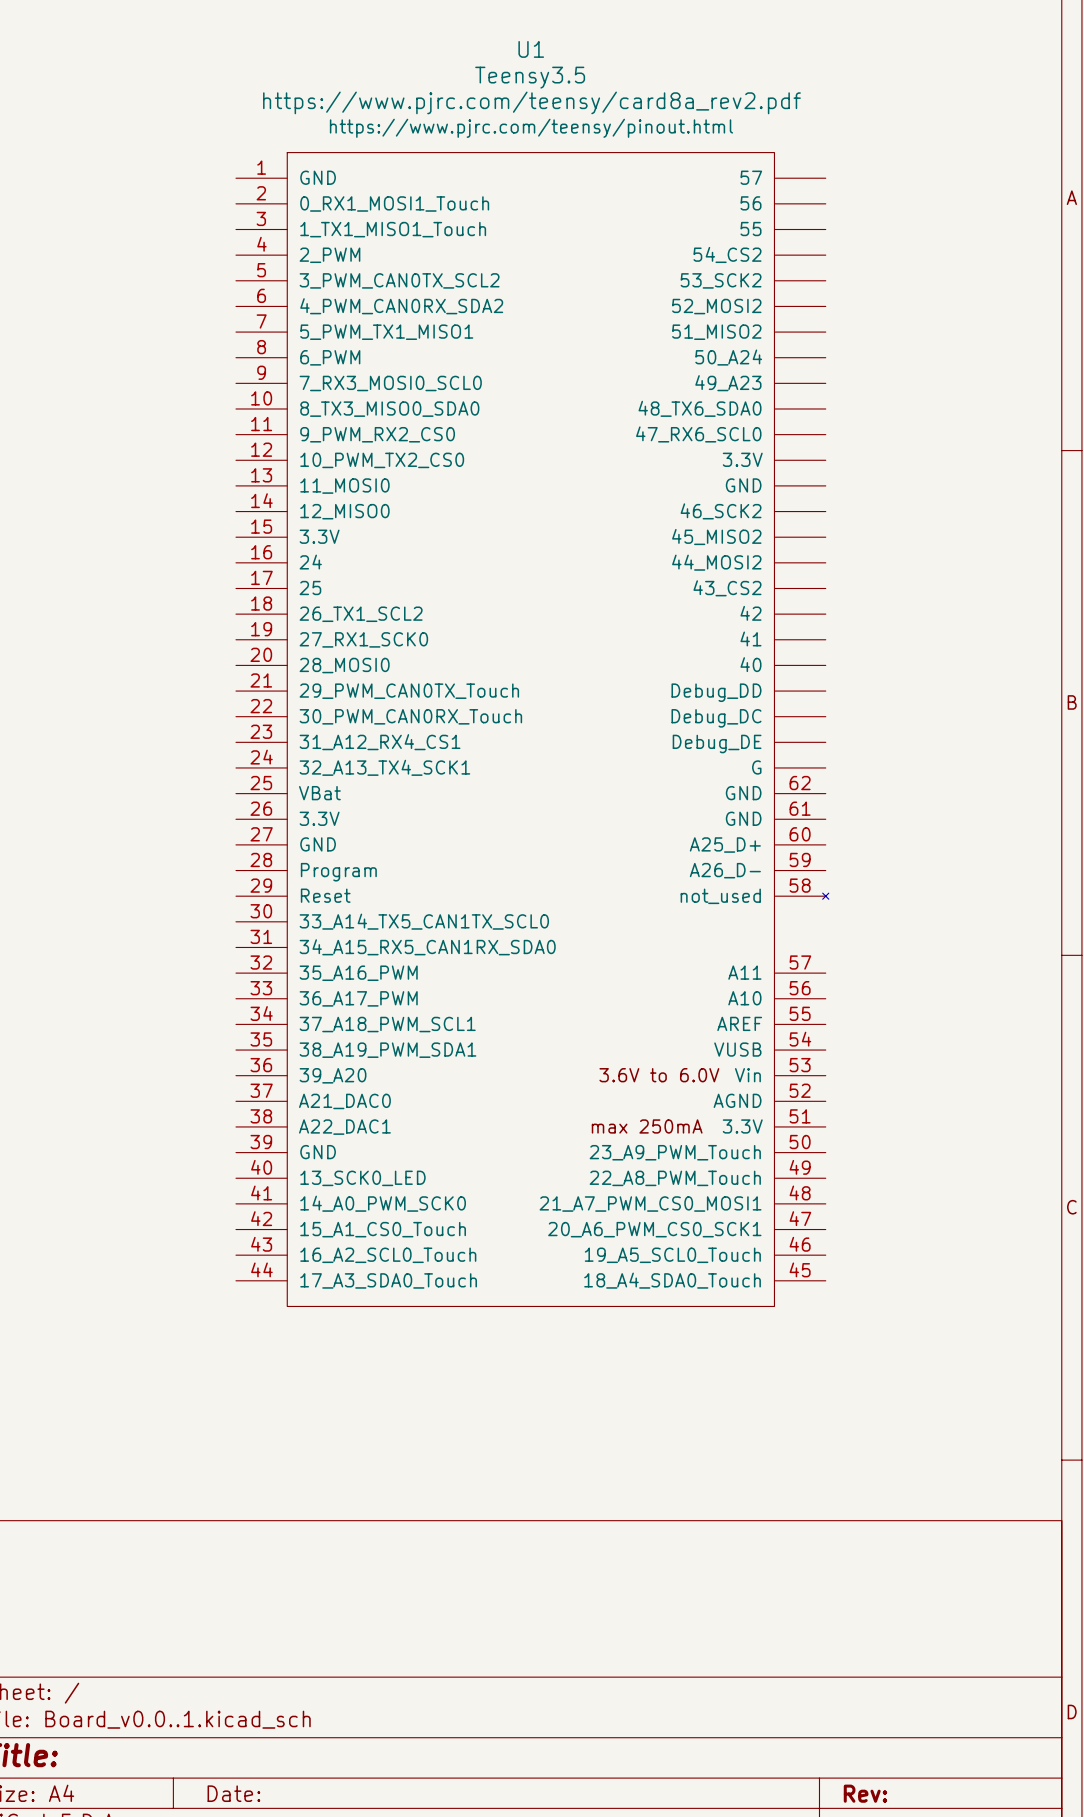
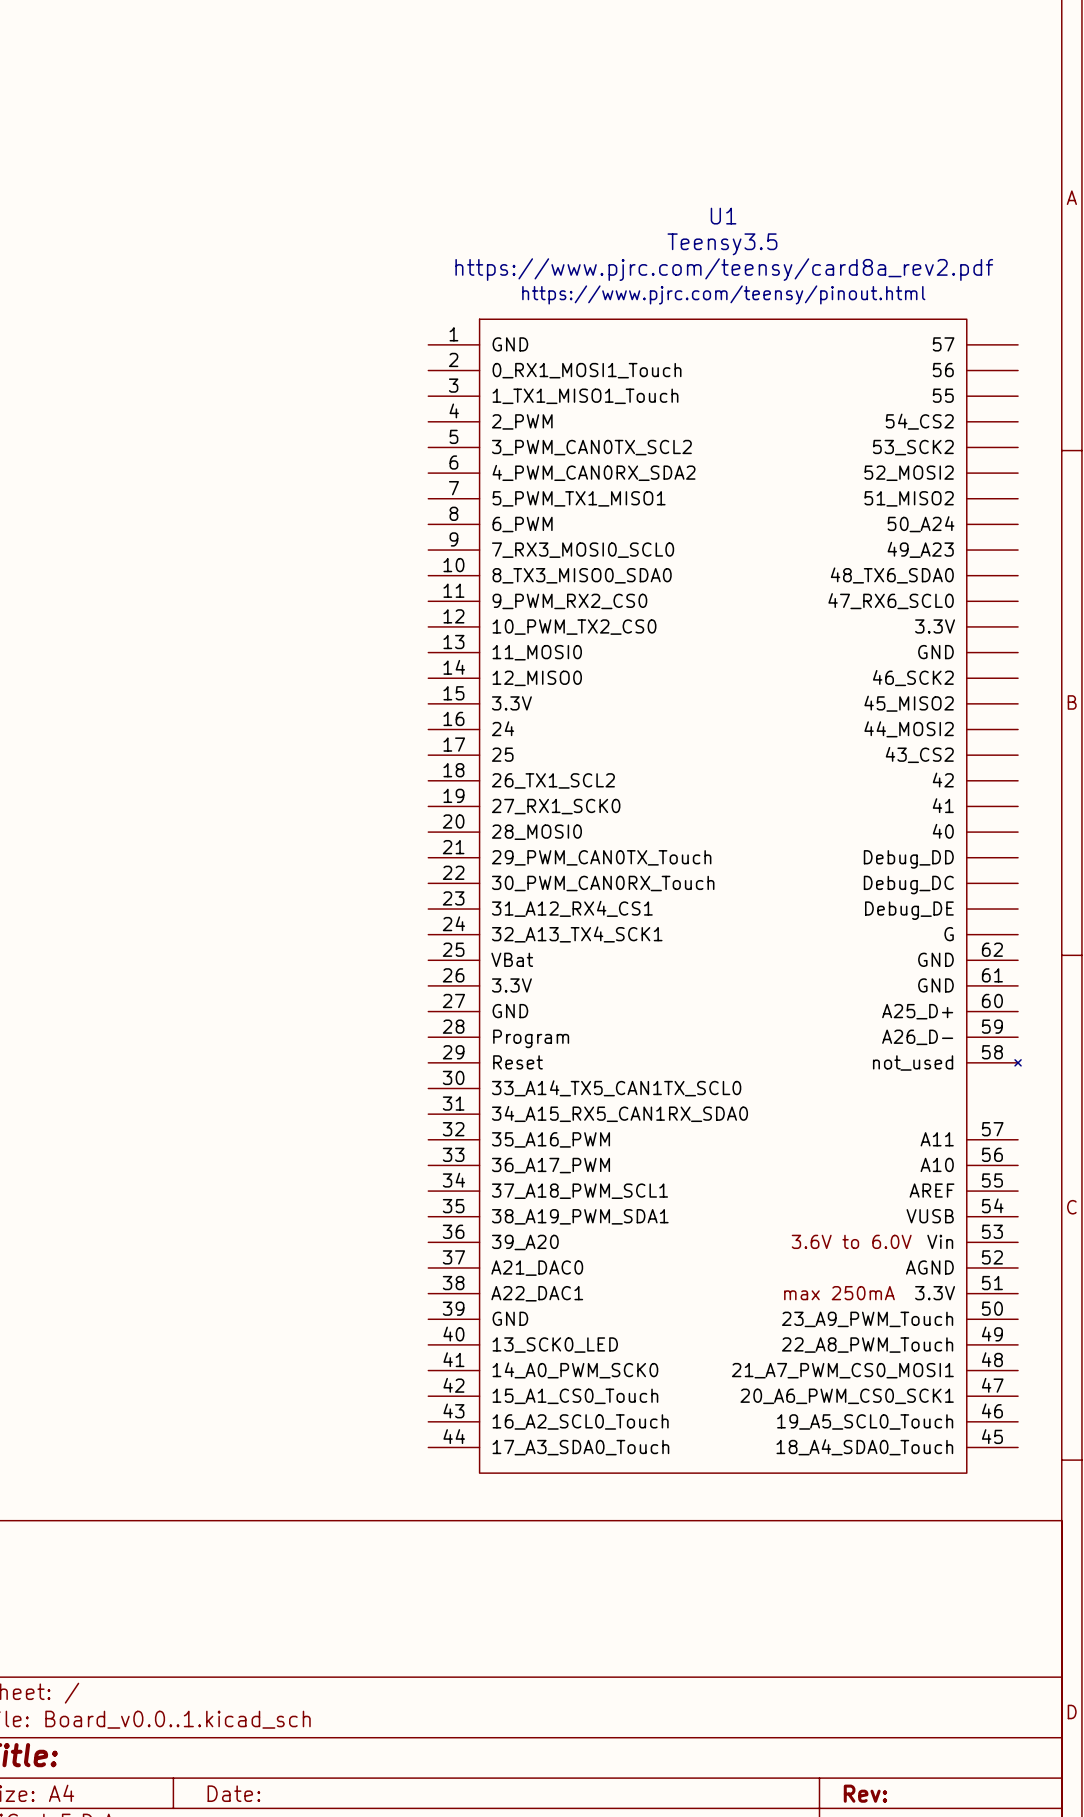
U1 position: (532, 729) -> (724, 896)

